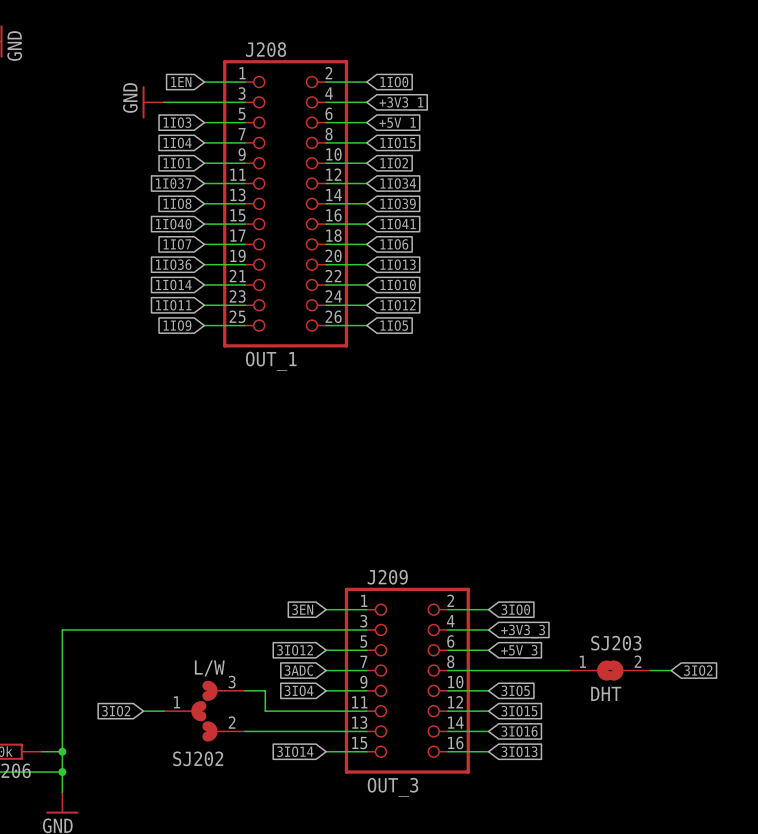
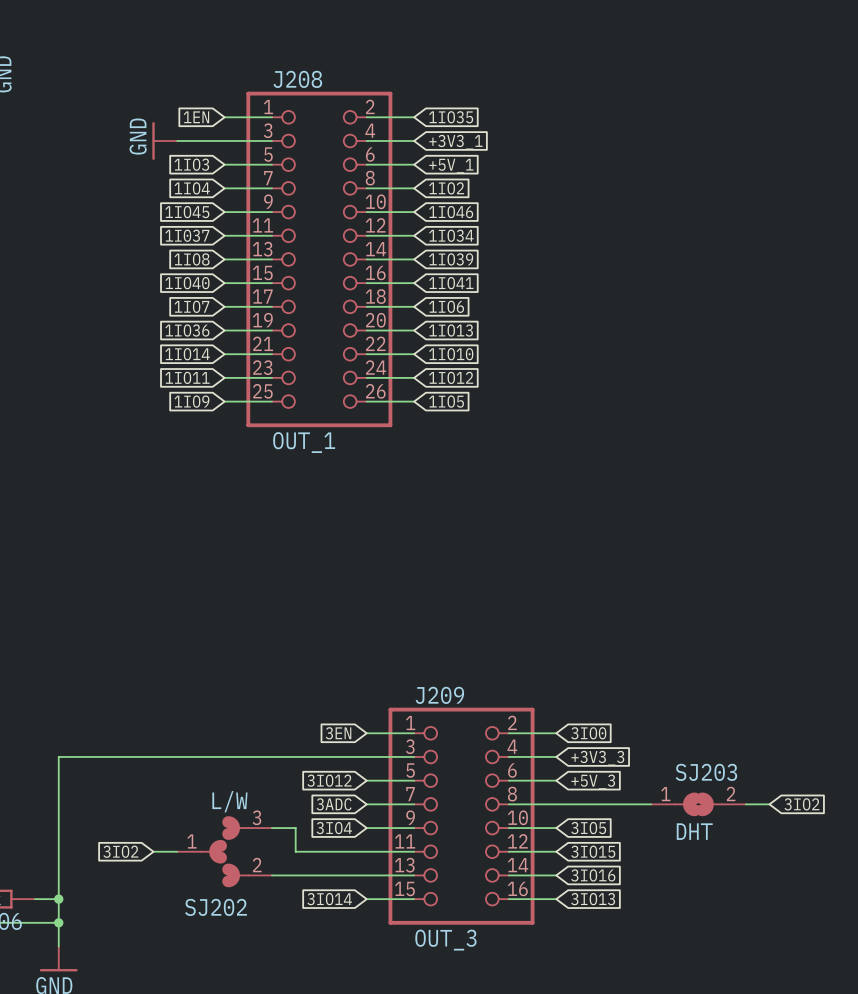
global label: 1IO0 (394, 82) -> 1IO35 (451, 117)
global label: 1IO15 (398, 142) -> 1IO2 (446, 188)
global label: 1IO1 (177, 163) -> 1IO45 (187, 212)
global label: 1IO2 (394, 163) -> 1IO46 (451, 212)

